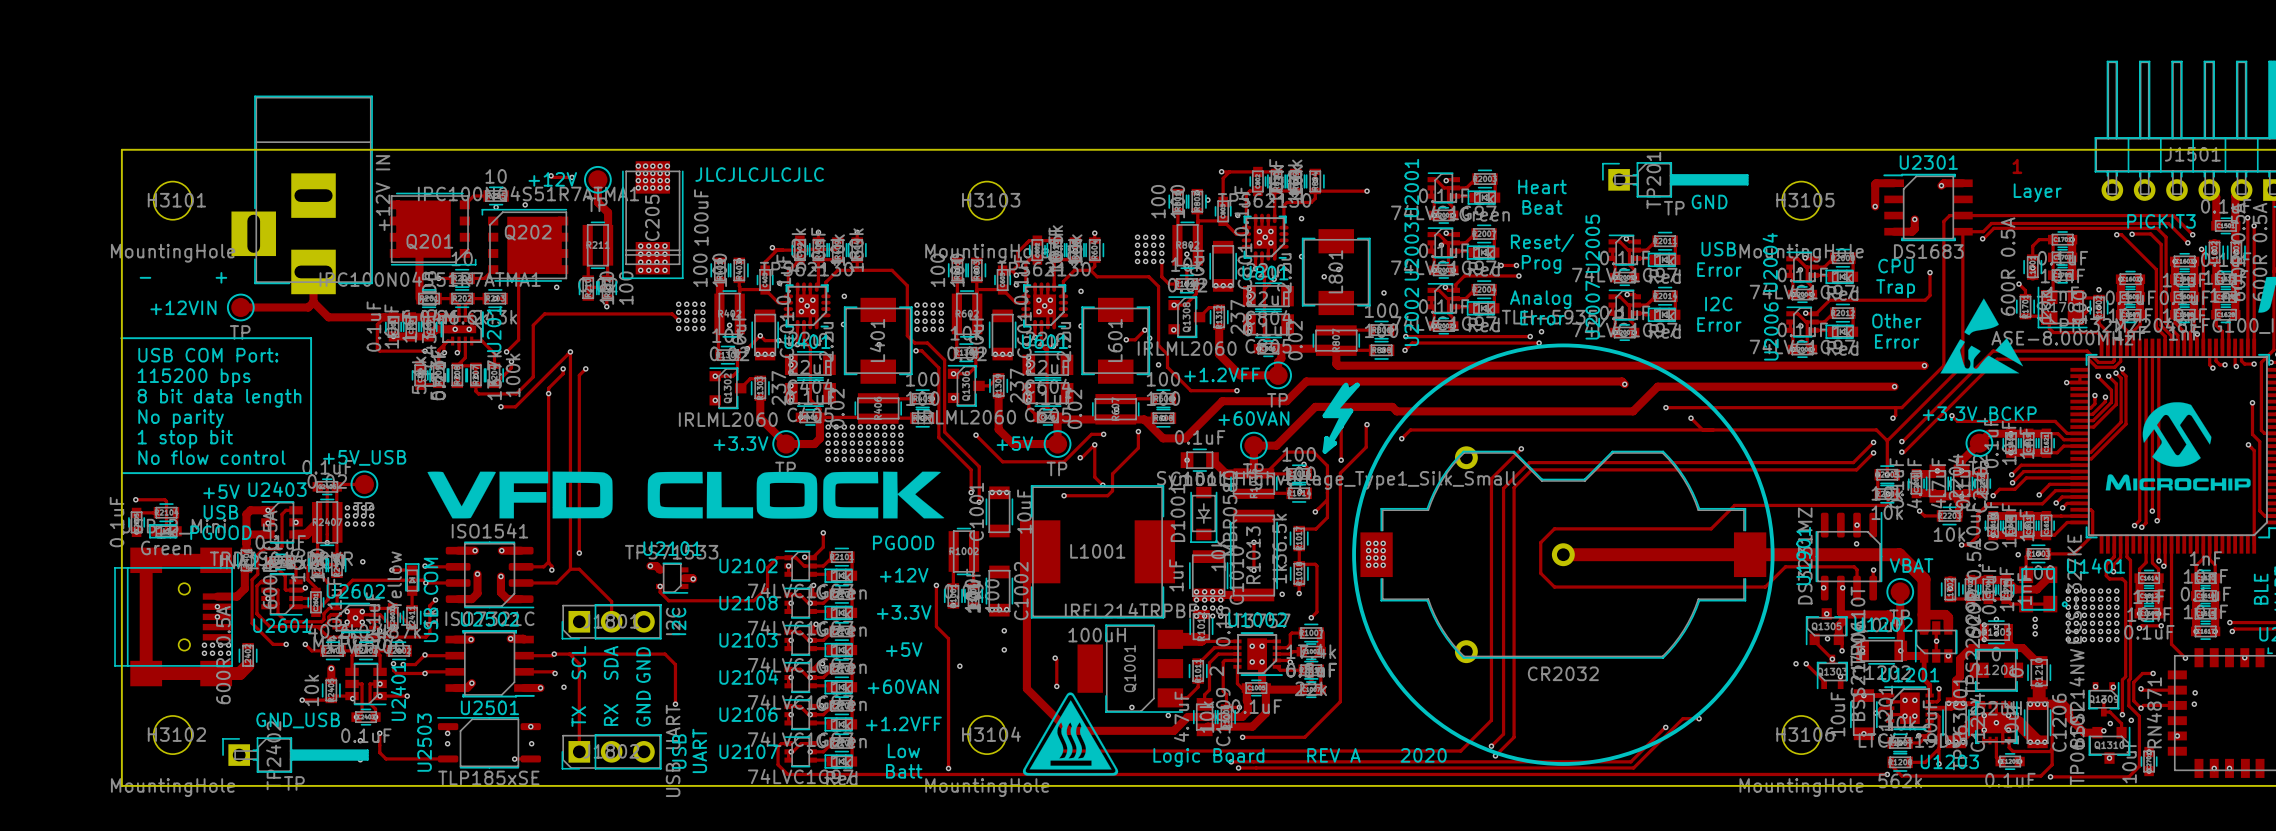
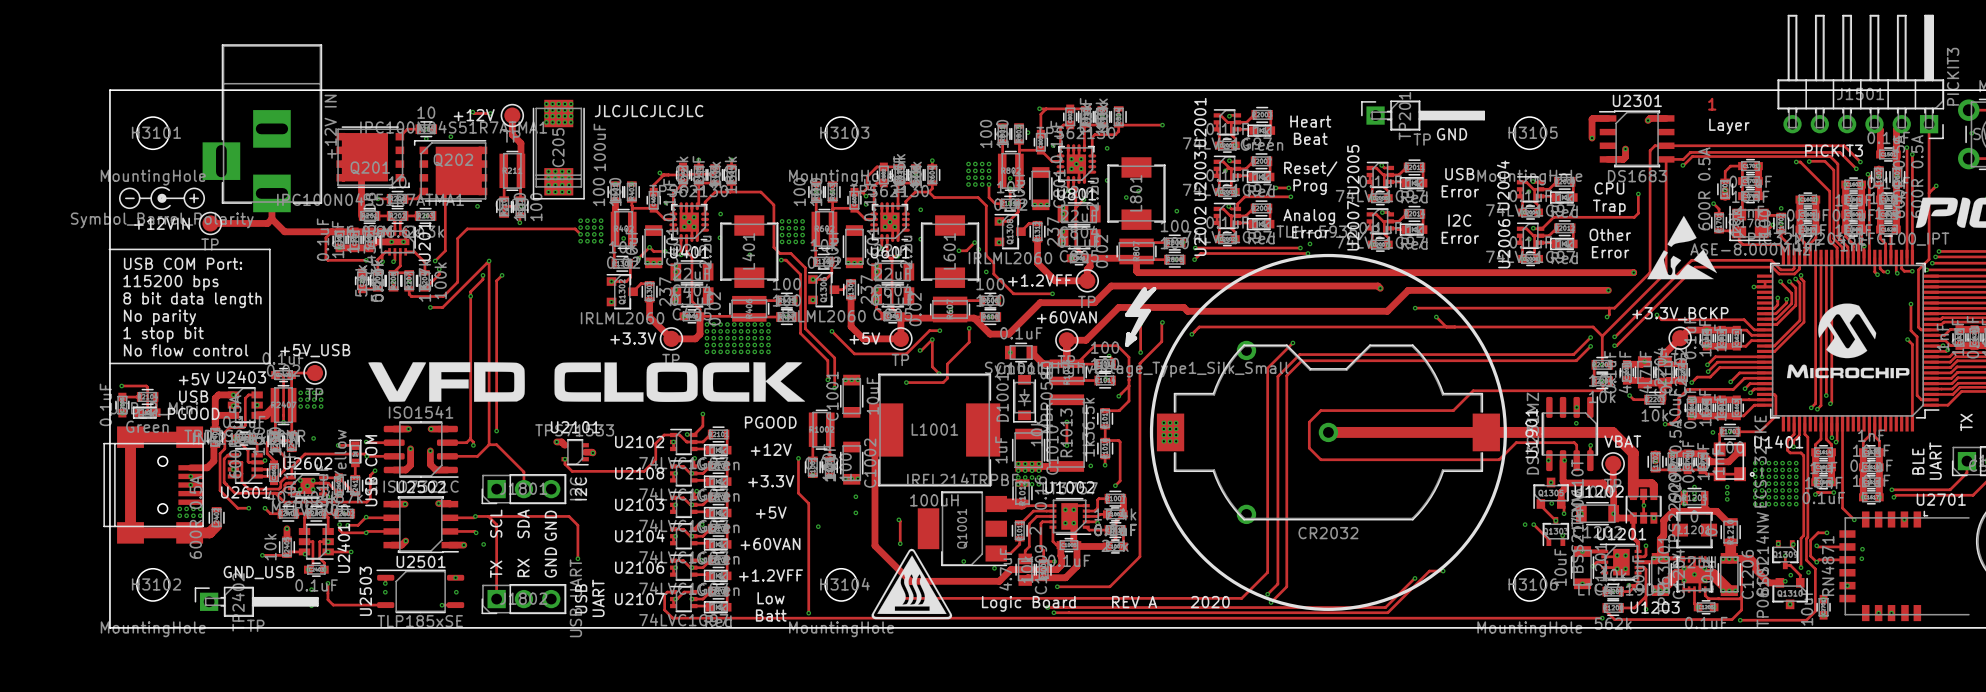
drawing: none -> [118, 186, 206, 210]

